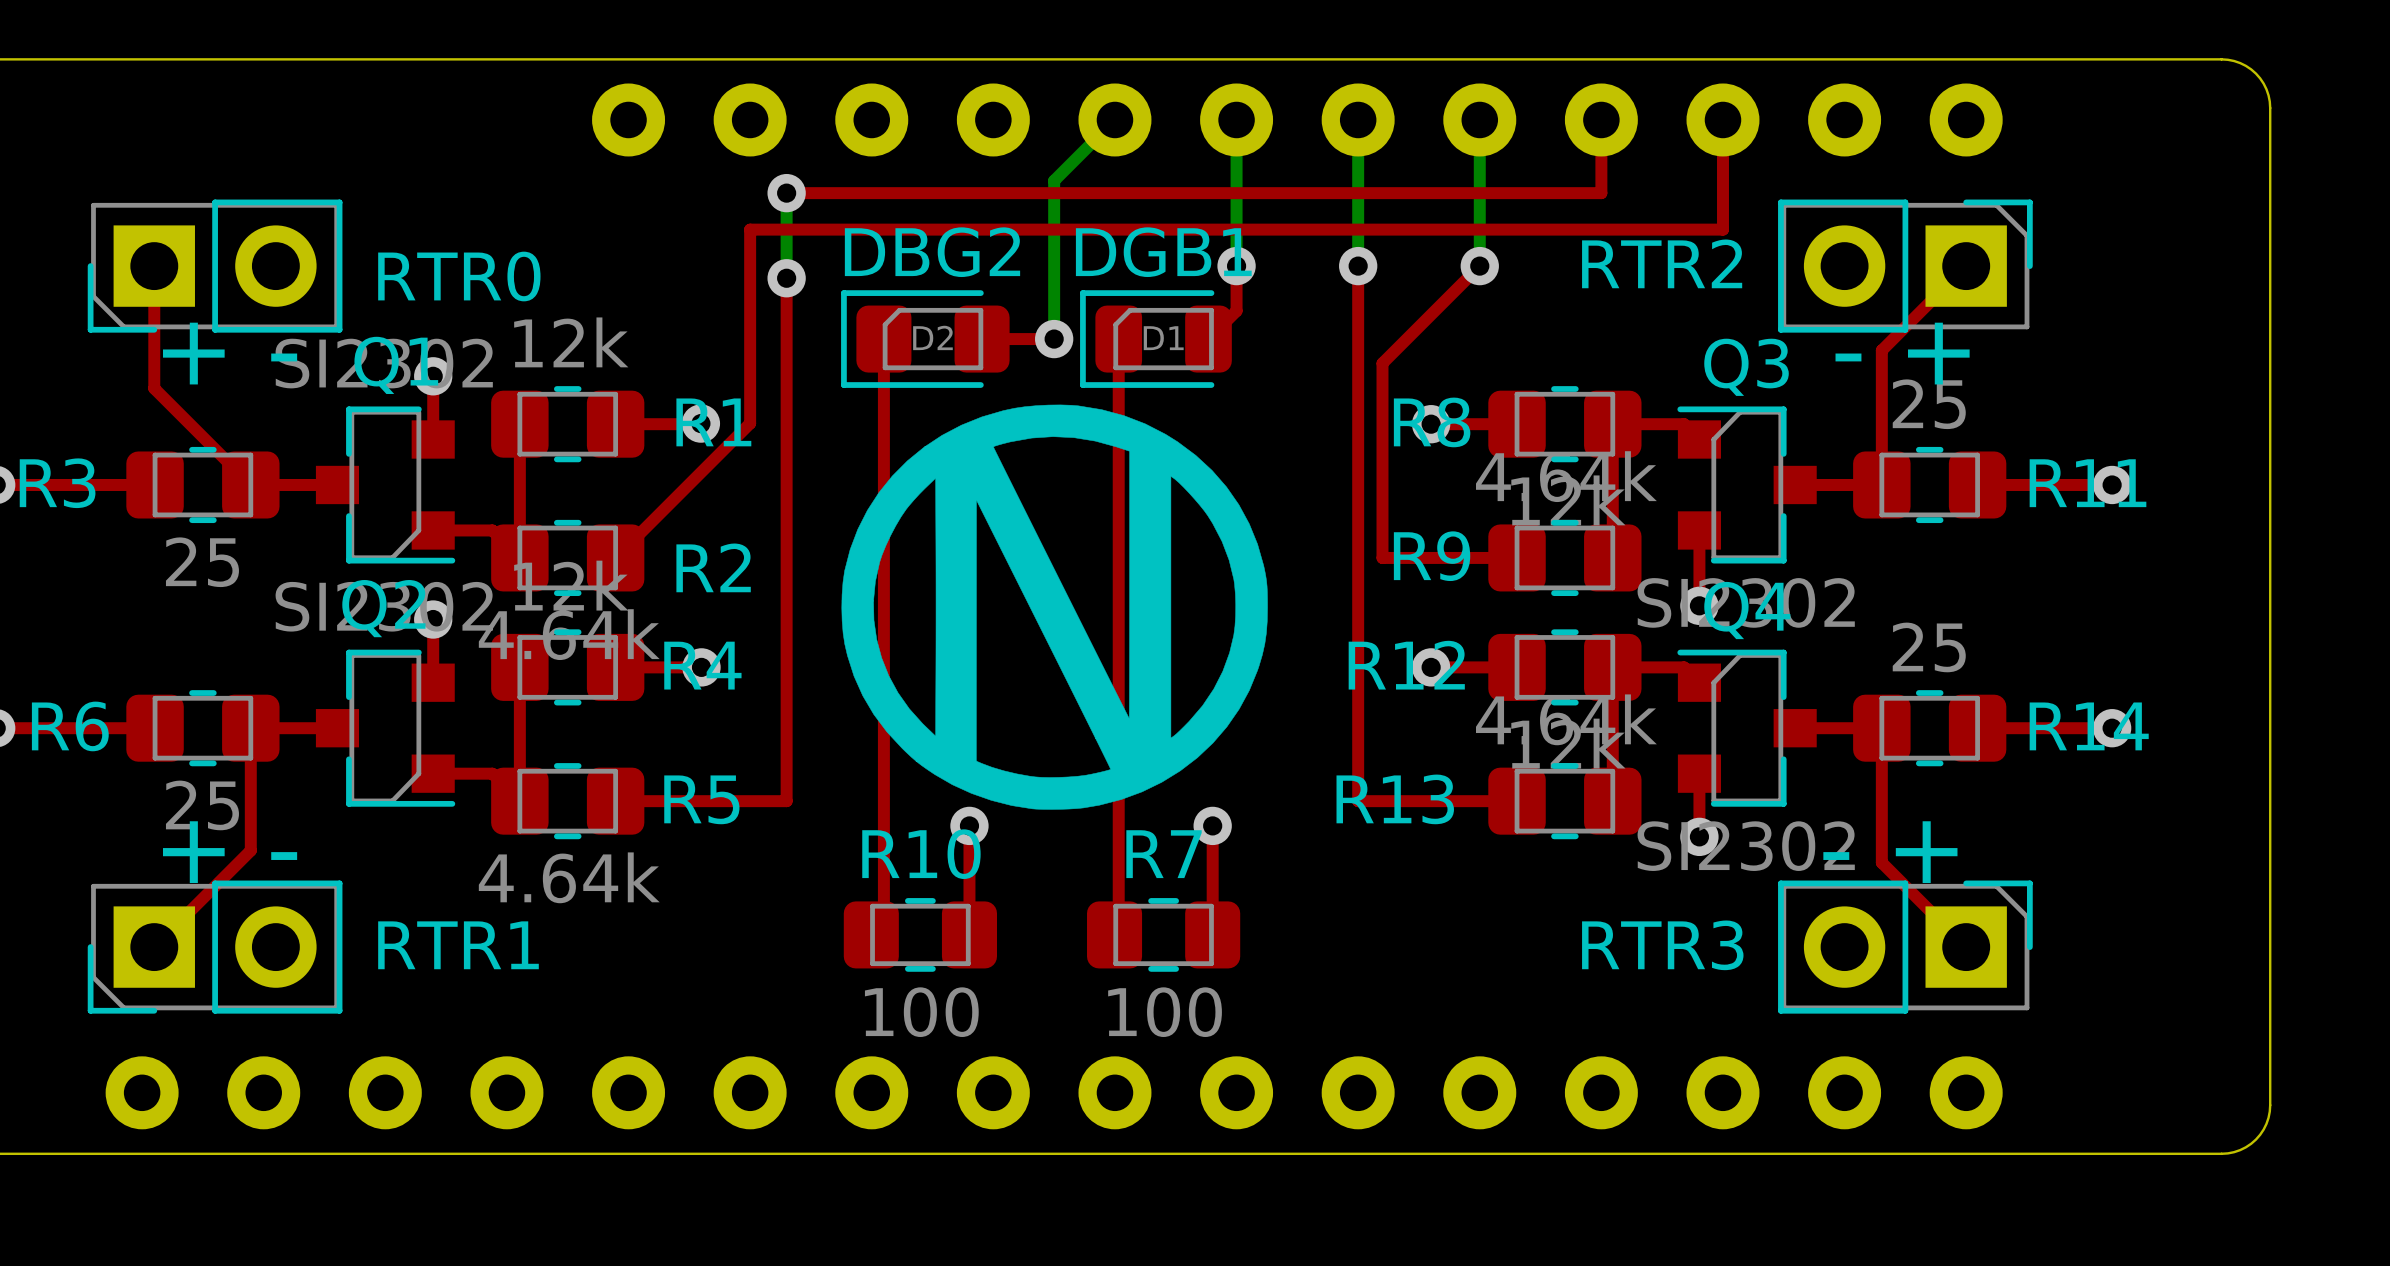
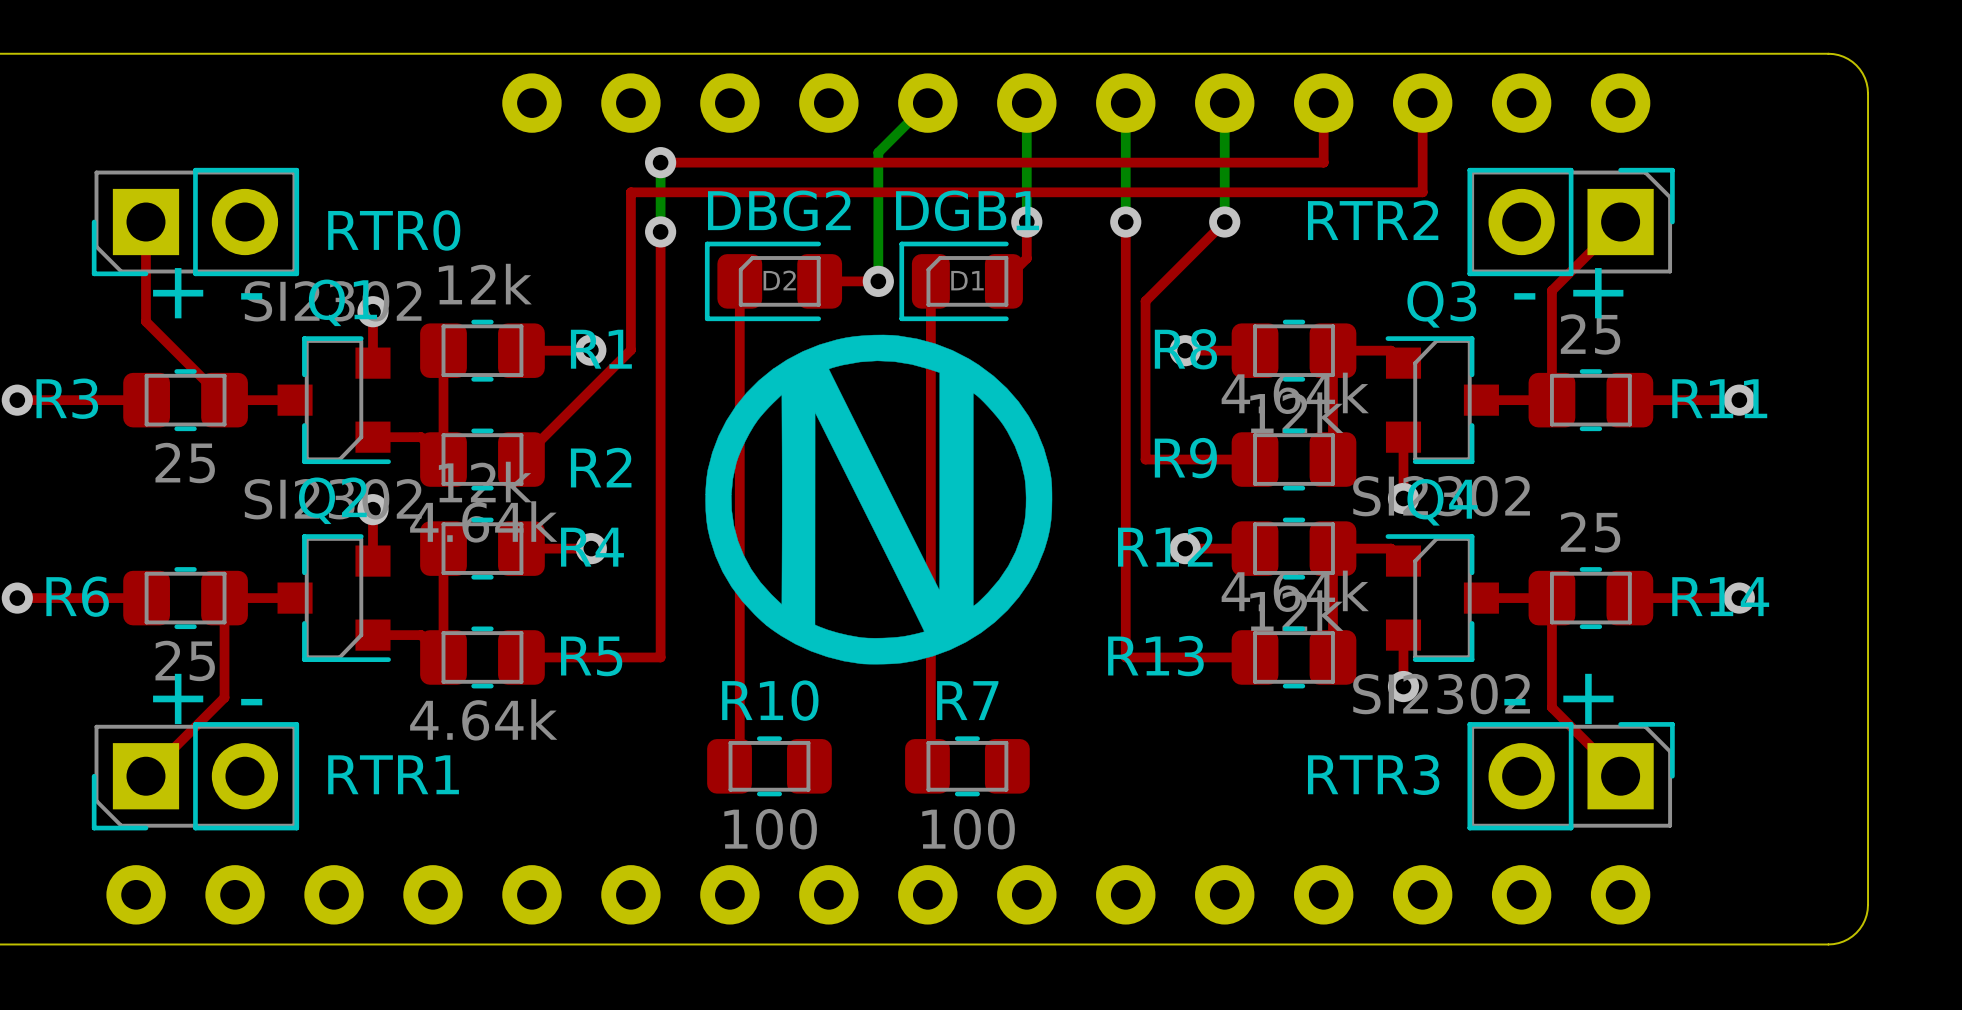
top track: (969, 825) (969, 934) -> none
via: (969, 825) -> none
top track: (1212, 825) (1212, 934) -> none
via: (1212, 825) -> none

